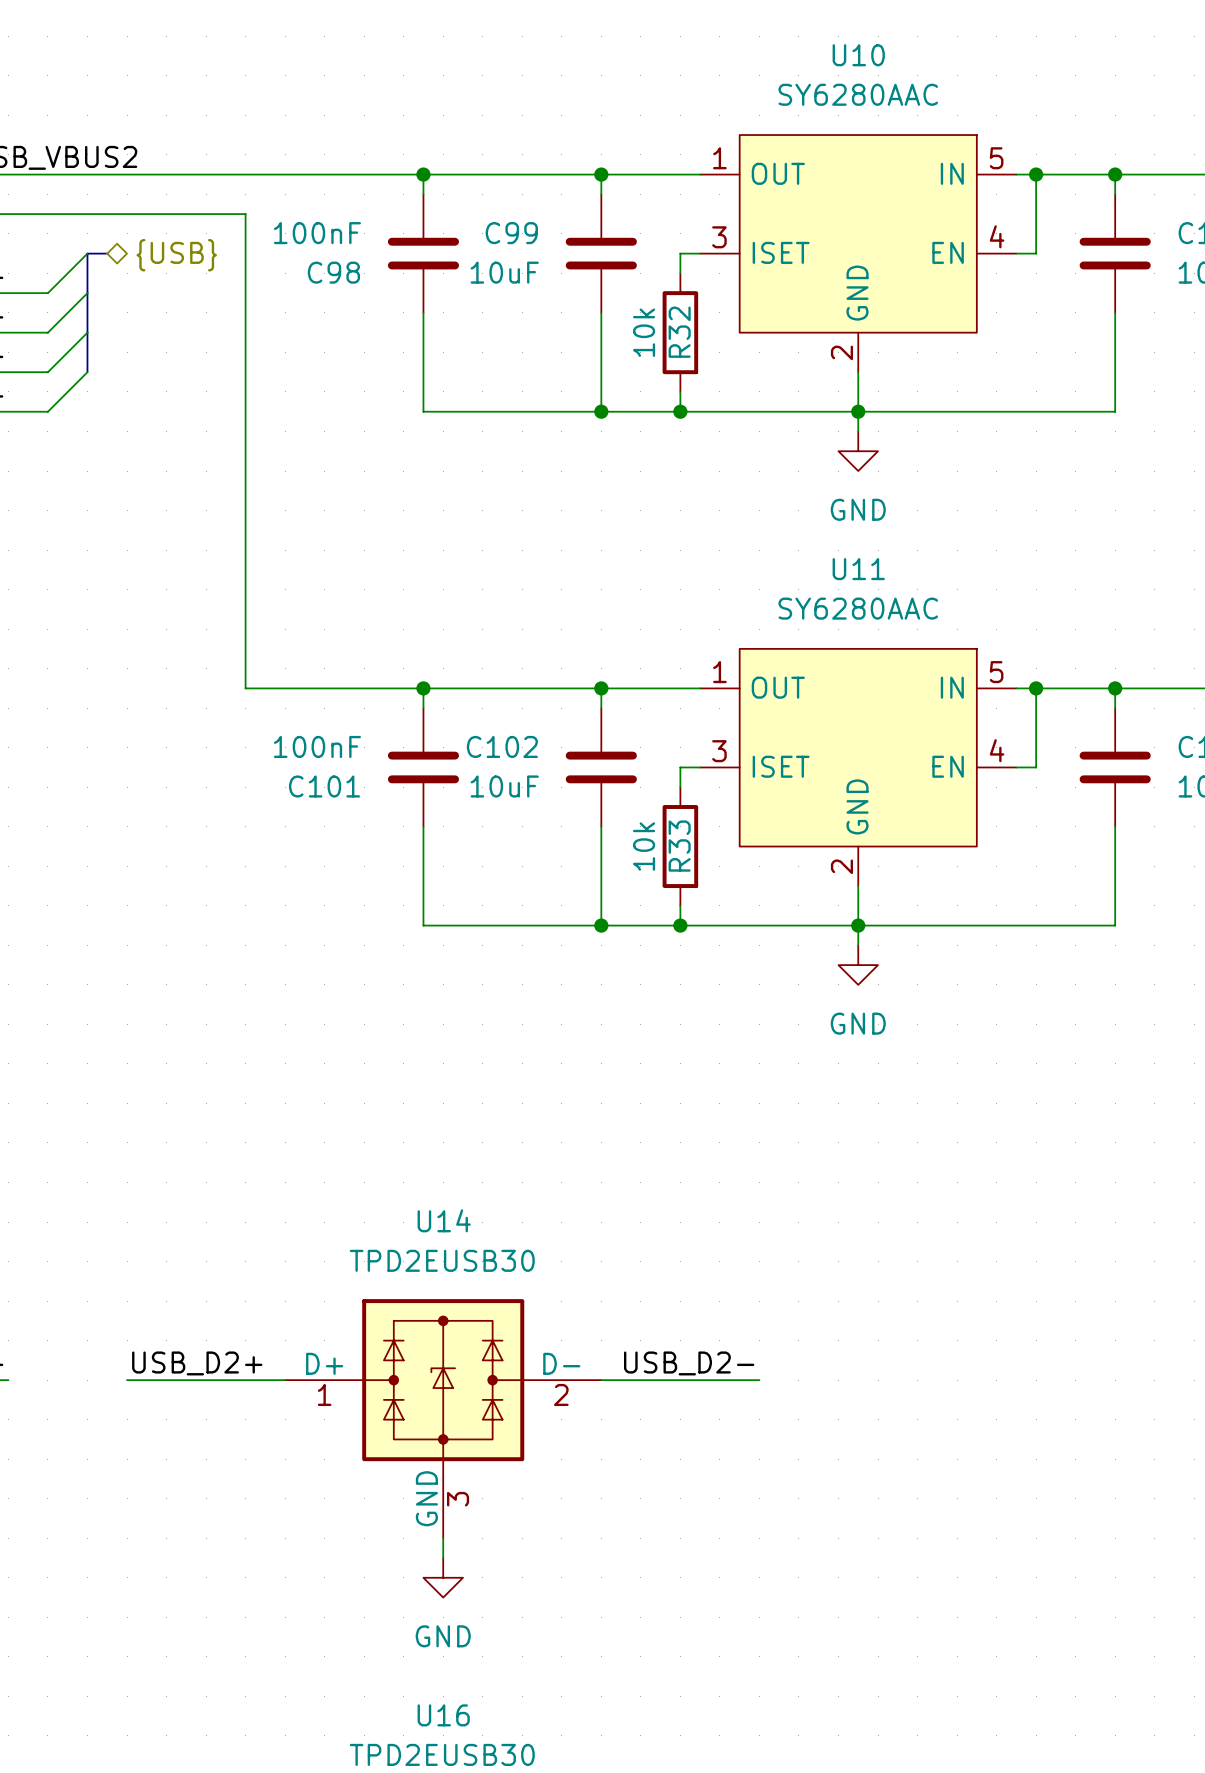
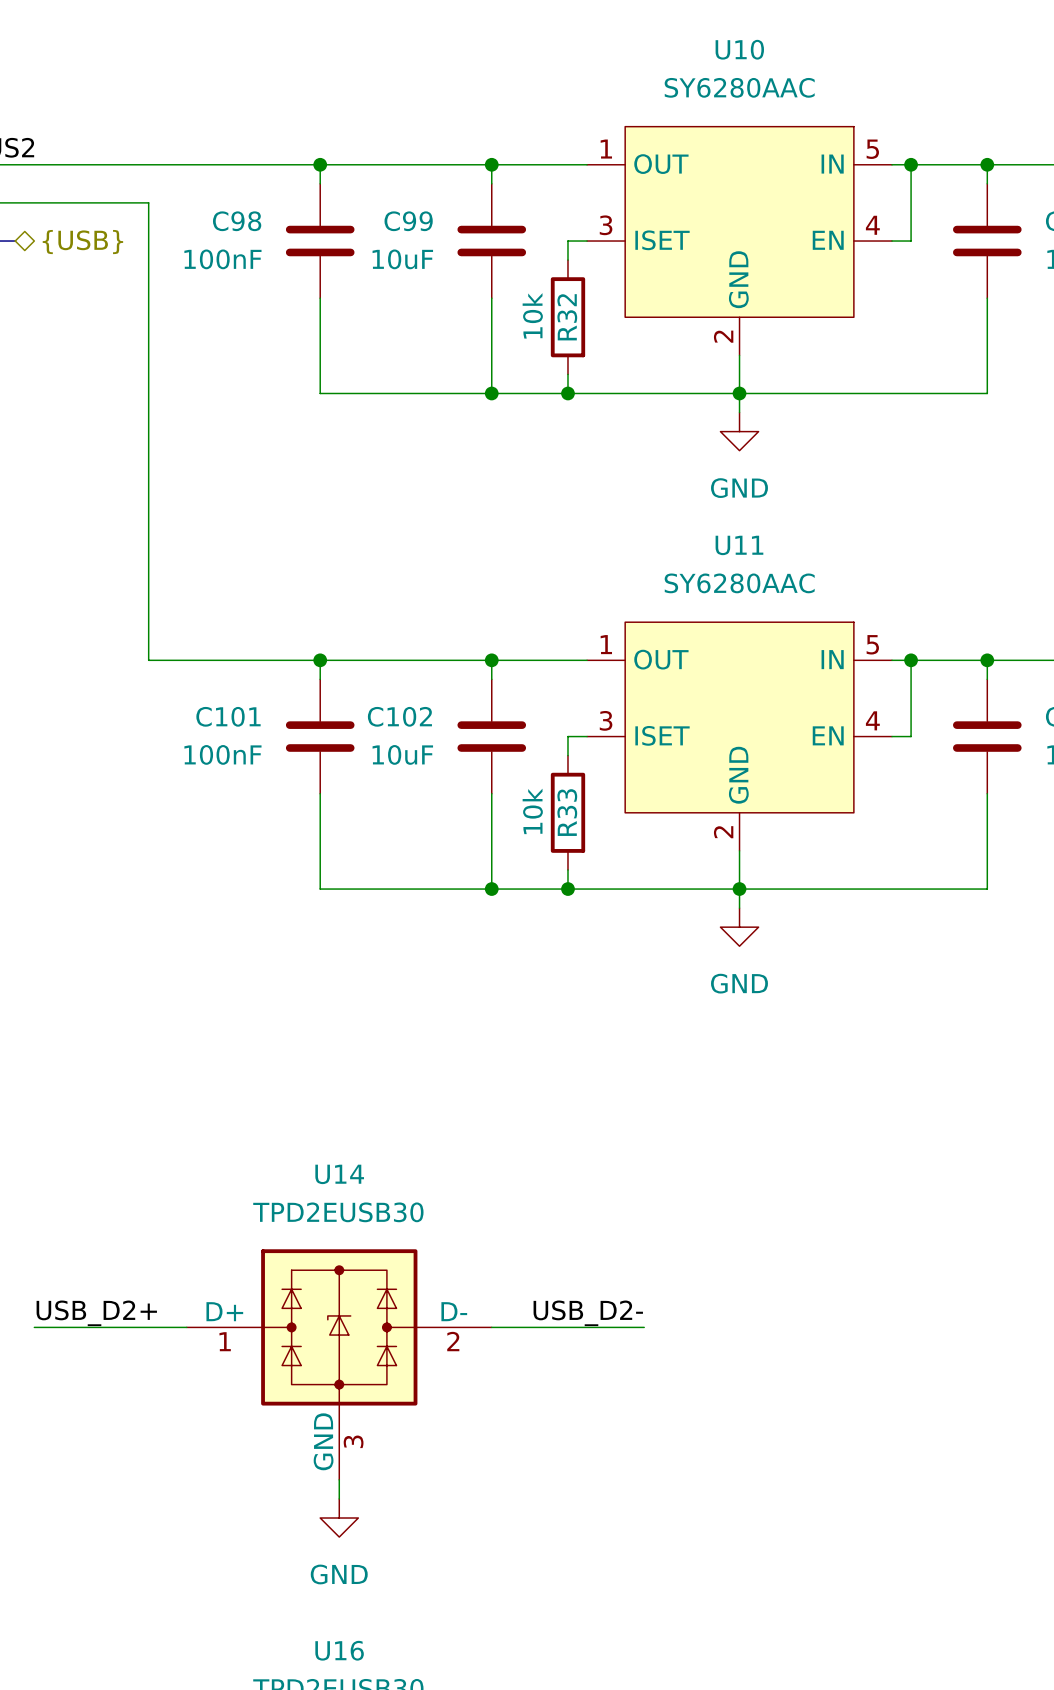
C98 value position: 100nF (317, 233) -> 100nF (222, 259)
C98 name position: C98 (333, 272) -> C98 (237, 221)
C101 value position: 100nF (317, 746) -> 100nF (222, 754)
C101 name position: C101 (324, 786) -> C101 (228, 716)

